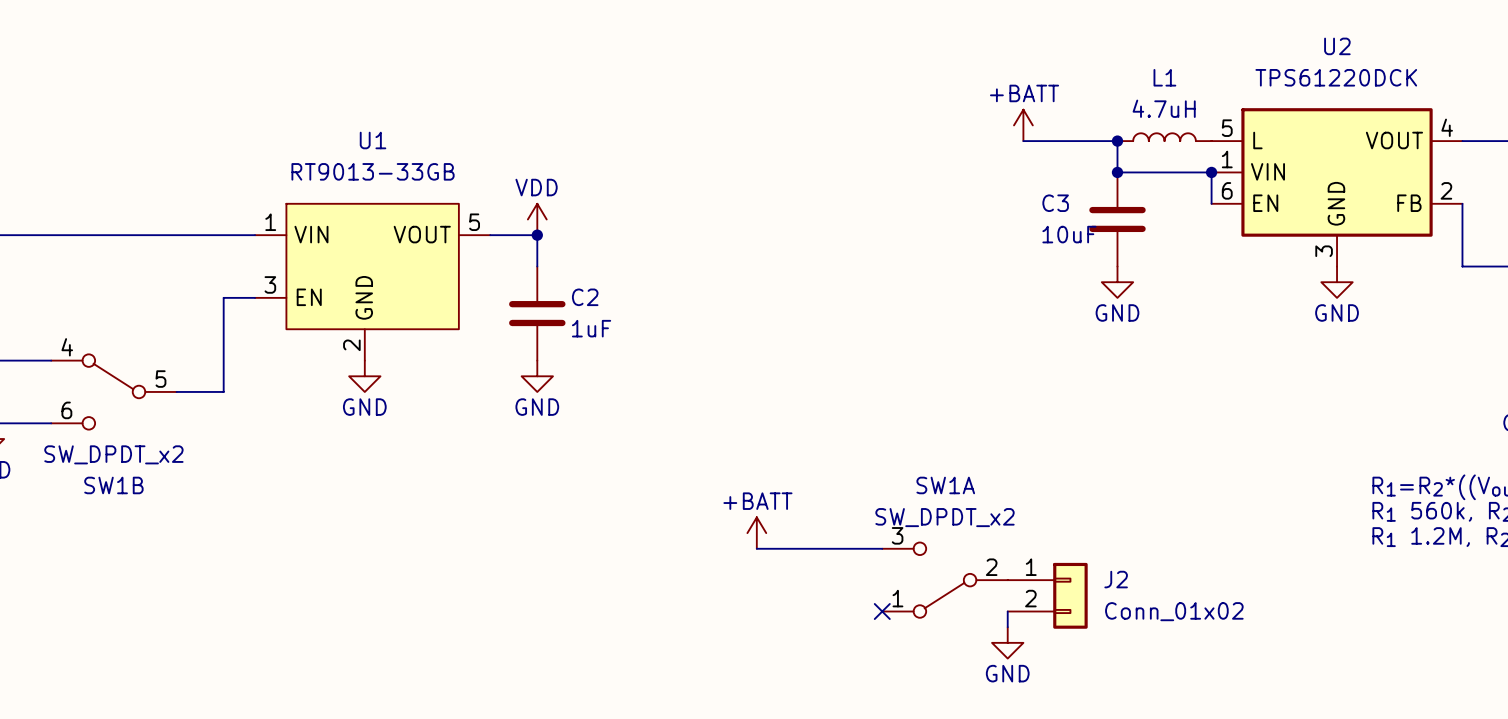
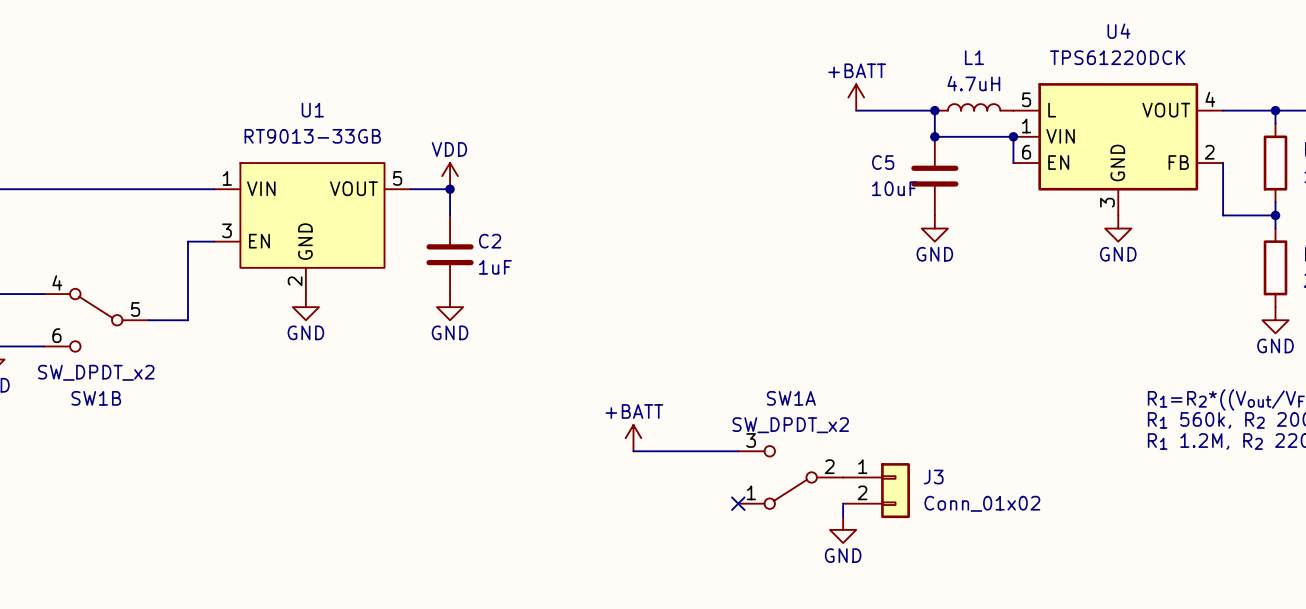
U2 name: U2 (1337, 46) -> U4 (1118, 31)
C3 name: C3 (1055, 203) -> C5 (883, 162)
J2 name: J2 (1116, 579) -> J3 (933, 477)

